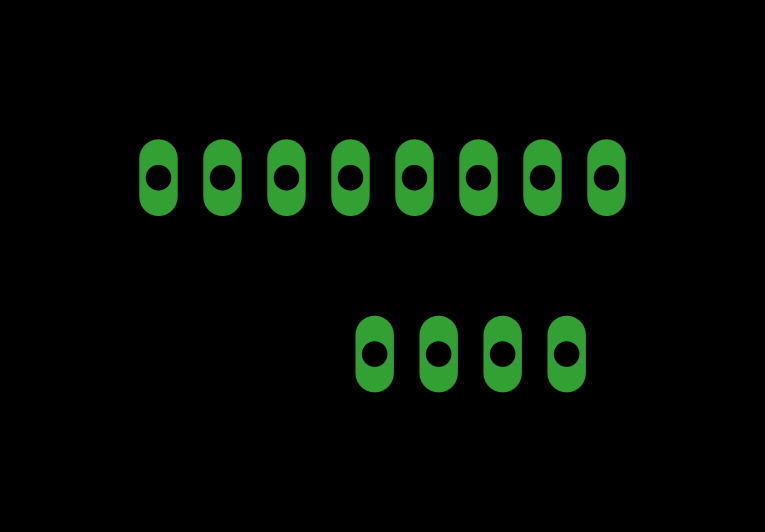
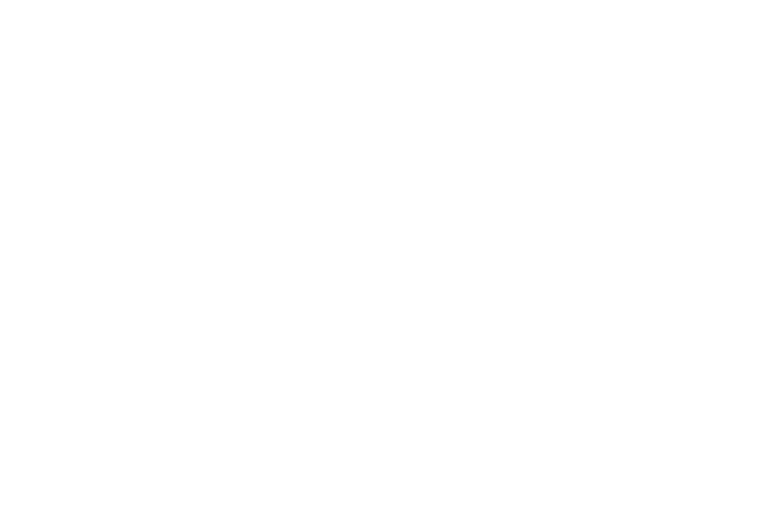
part: (382, 177) -> none
part: (470, 354) -> none

